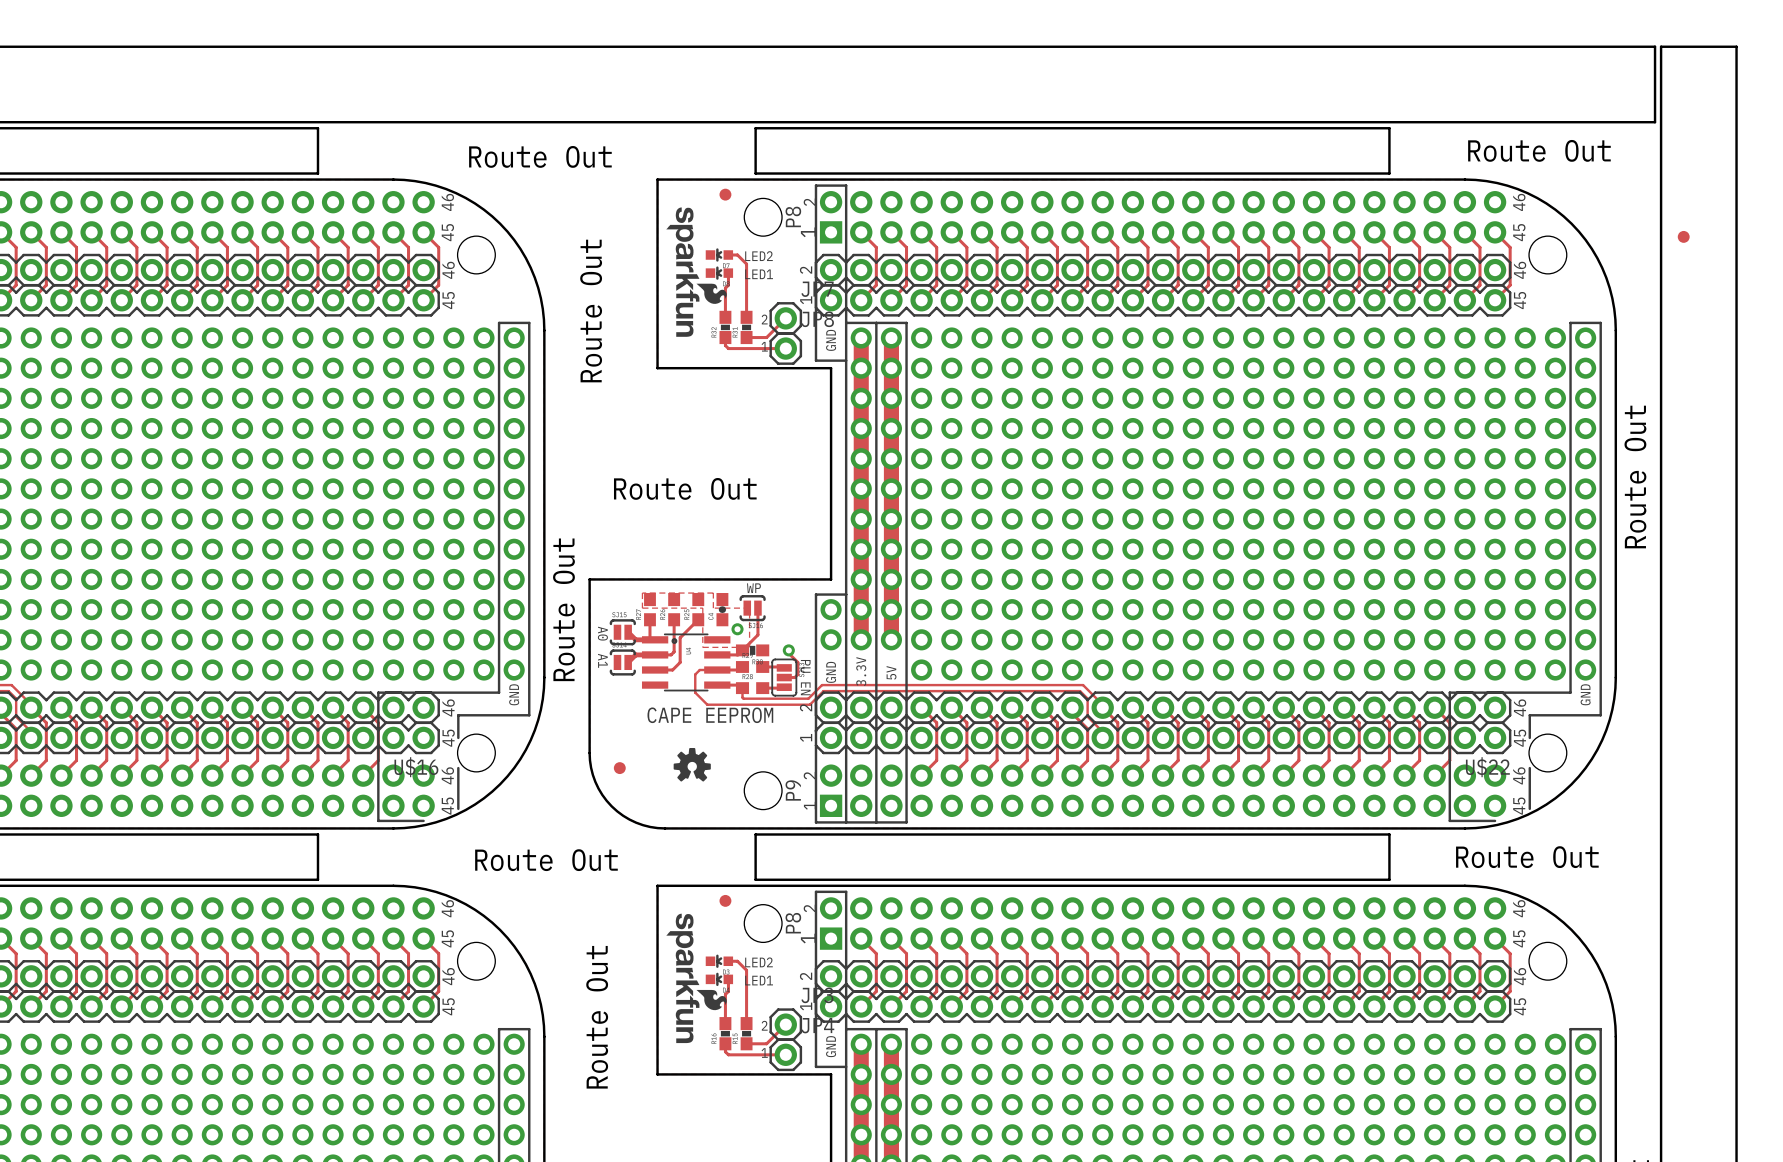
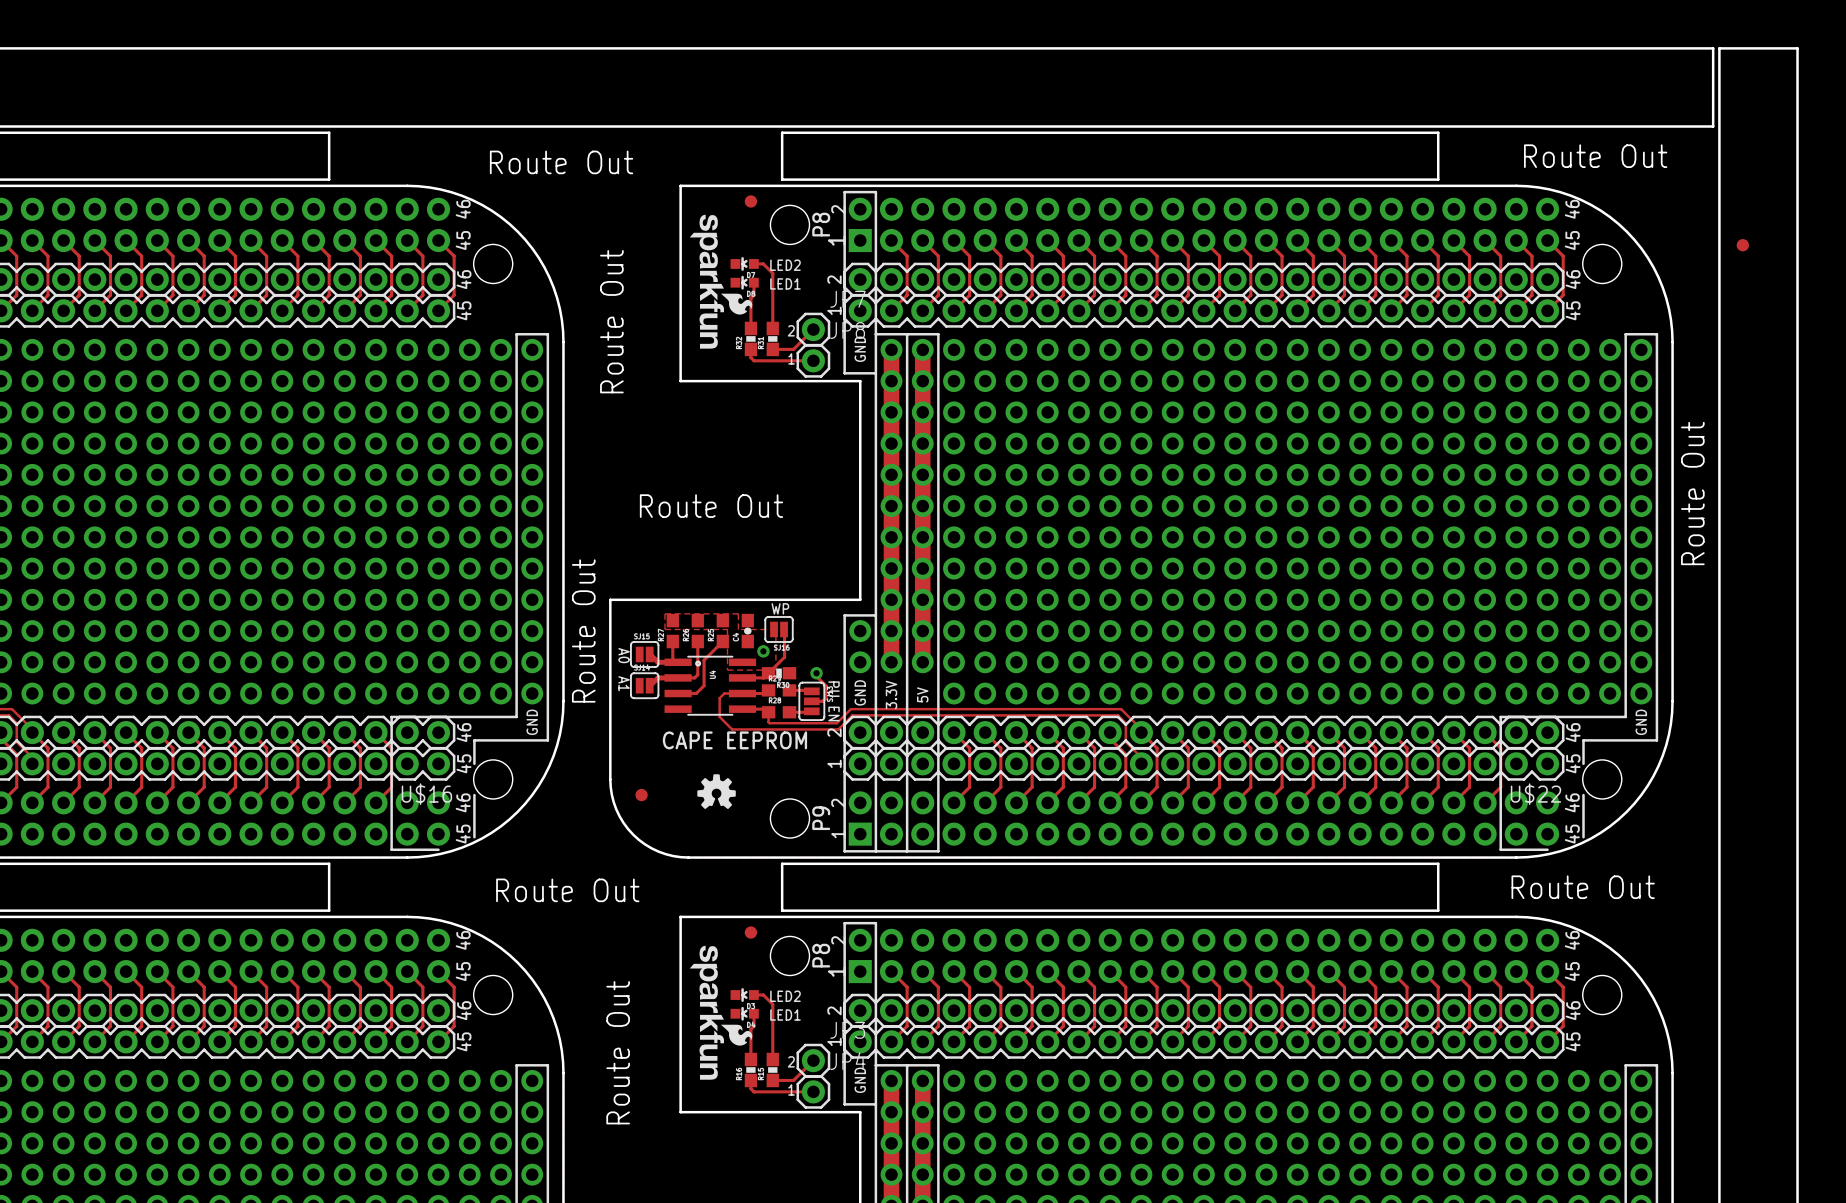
part footprint: [739, 595, 766, 622] -> [764, 616, 794, 643]
part footprint: [609, 619, 636, 646] -> [630, 641, 660, 668]
part footprint: [609, 649, 636, 676] -> [630, 672, 660, 700]

